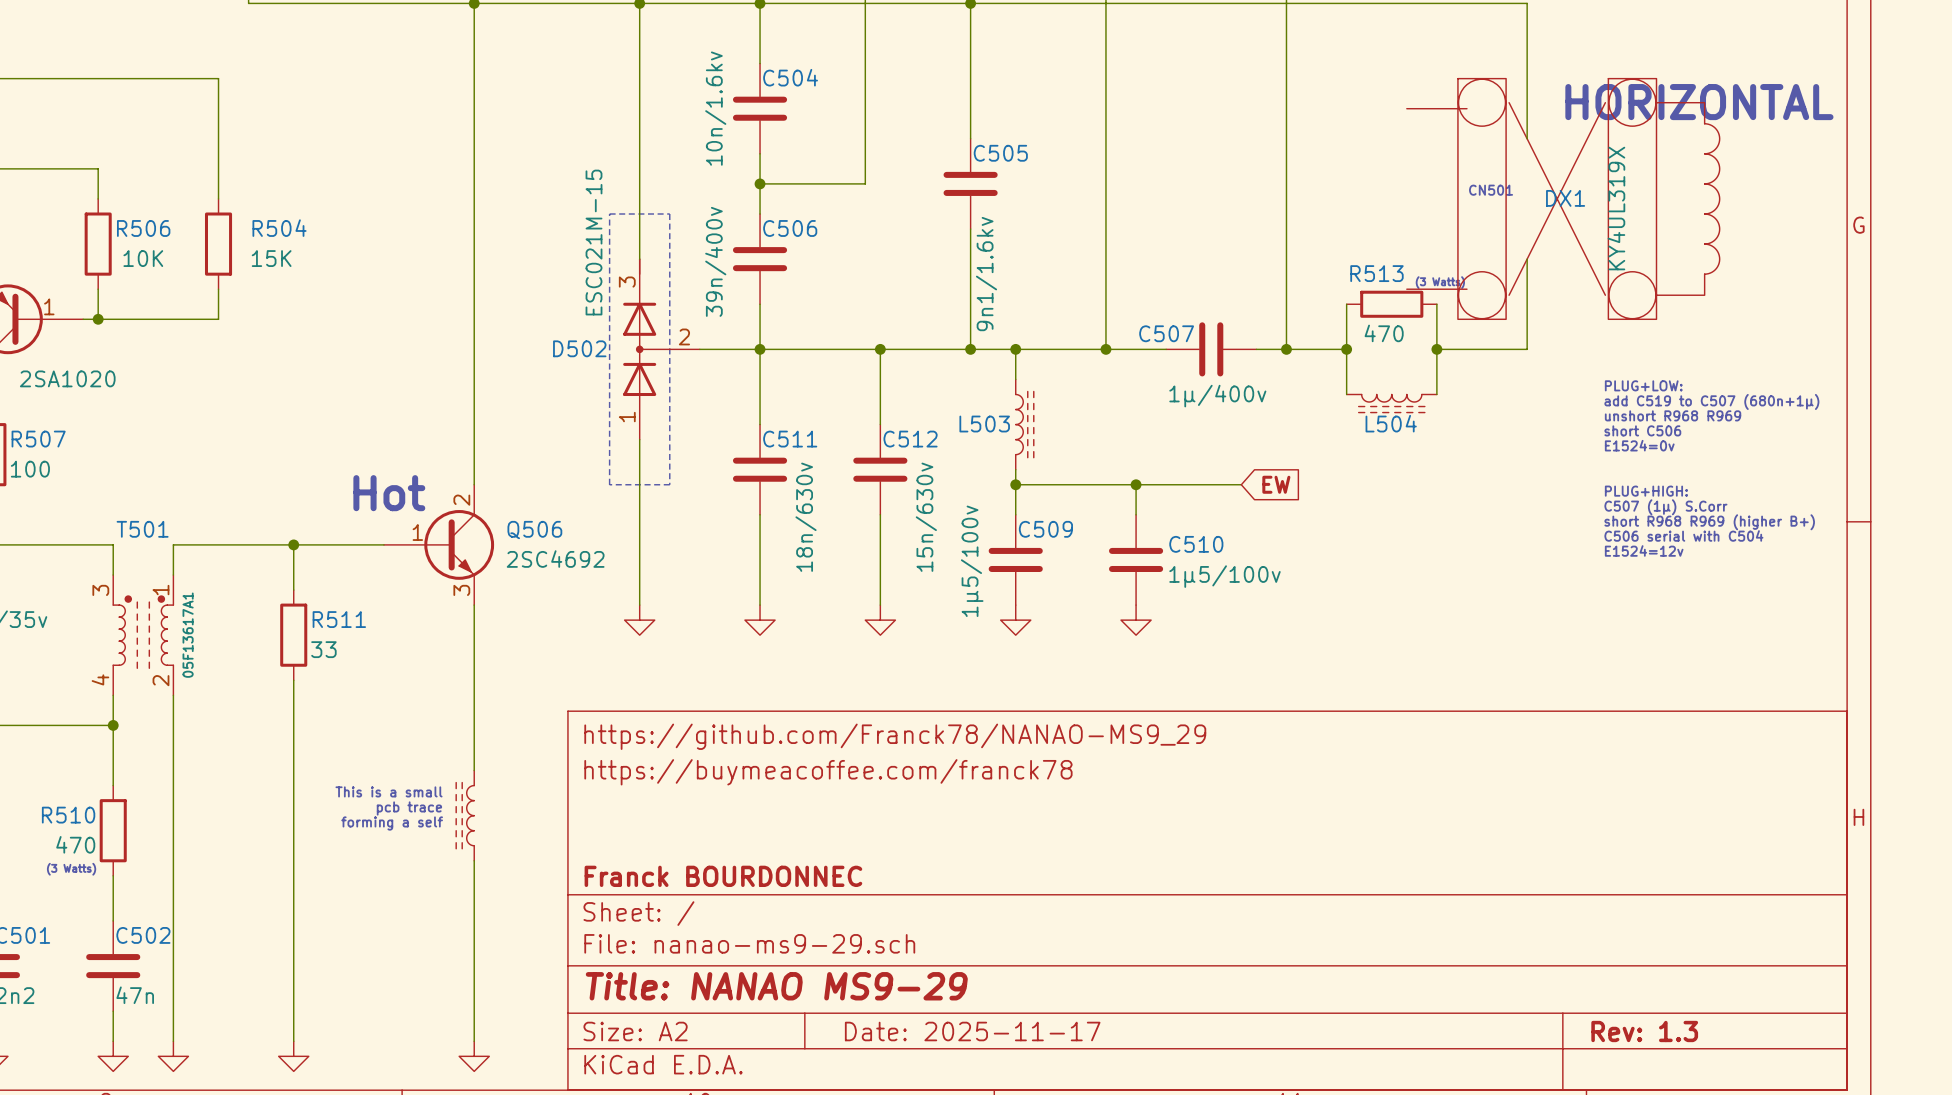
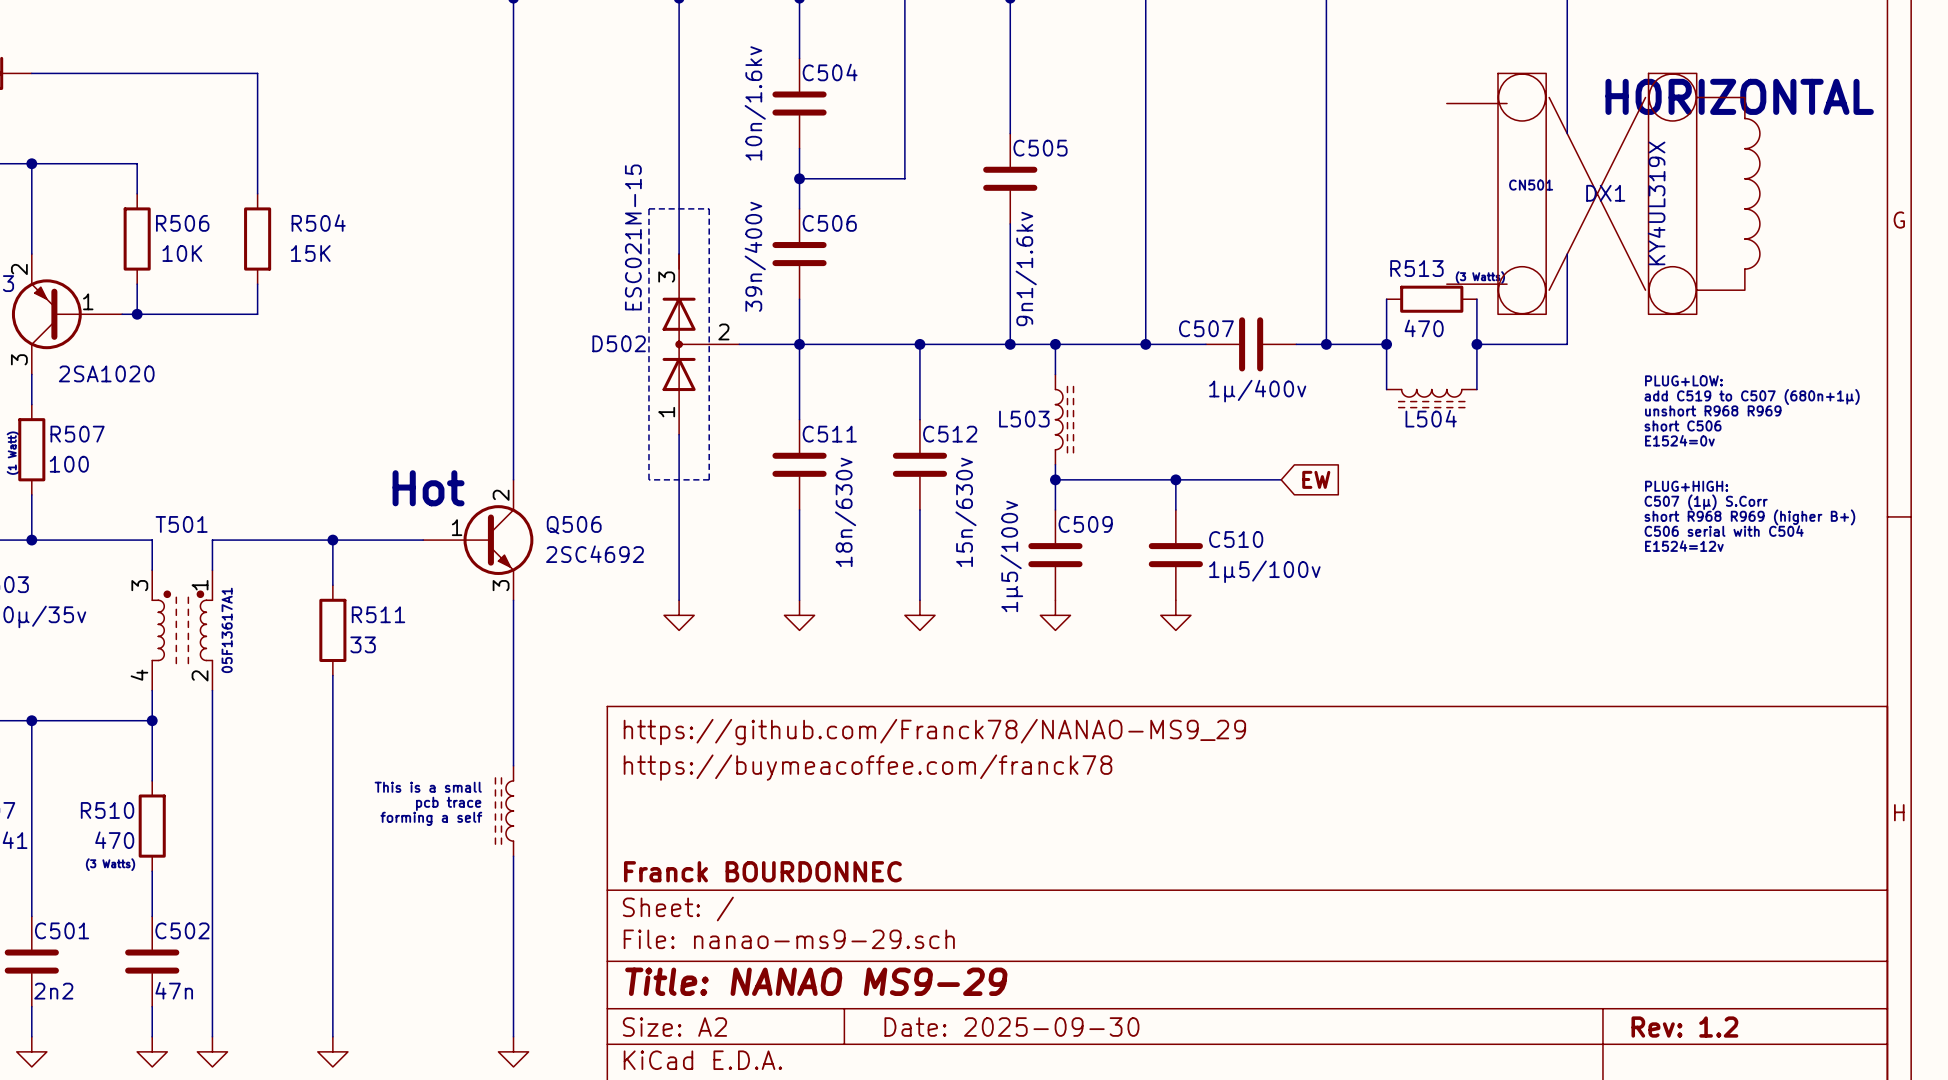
title block: Date: 2025-11-17 (972, 1031) -> Date: 2025-09-30 (1011, 1027)
title block: Rev: 1.3 (1644, 1031) -> Rev: 1.2 (1684, 1027)

